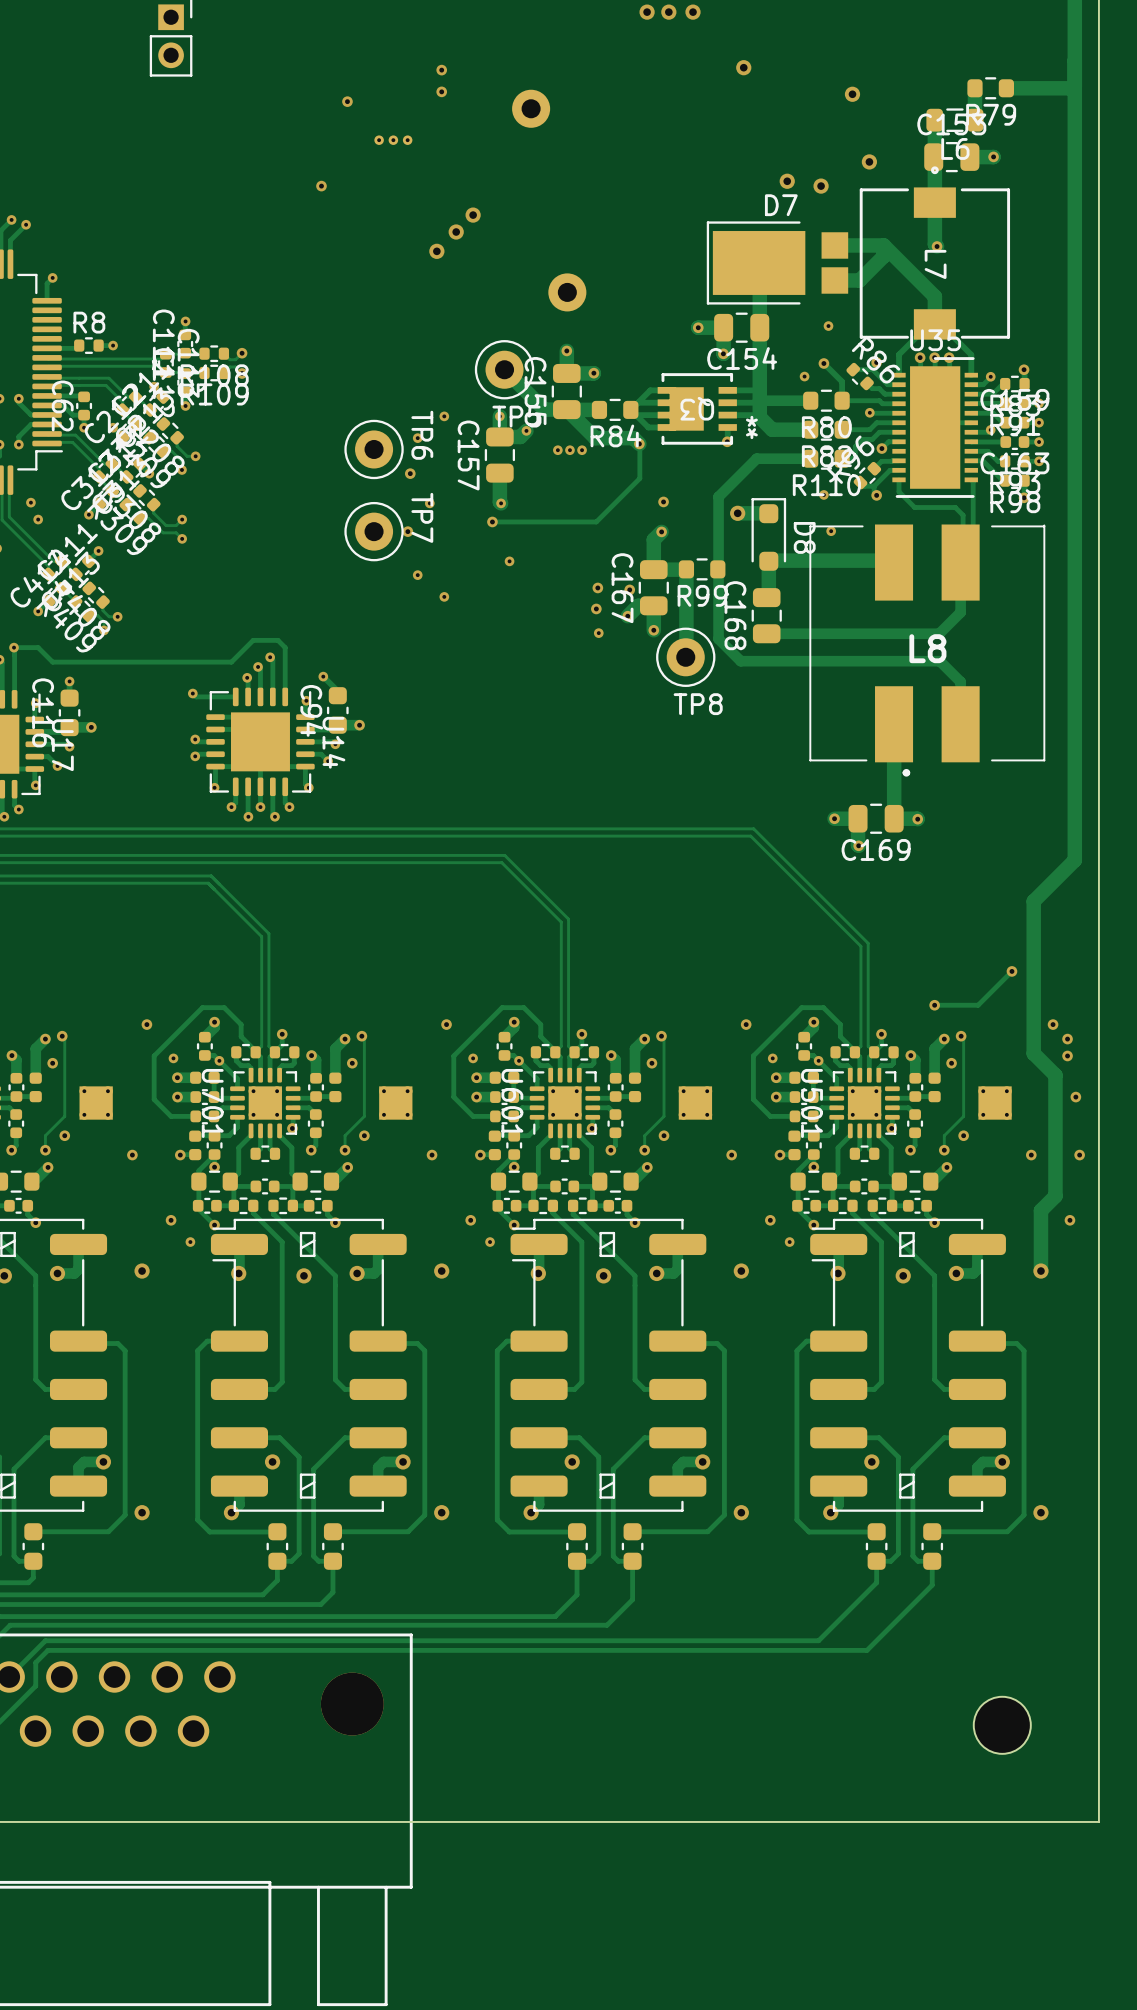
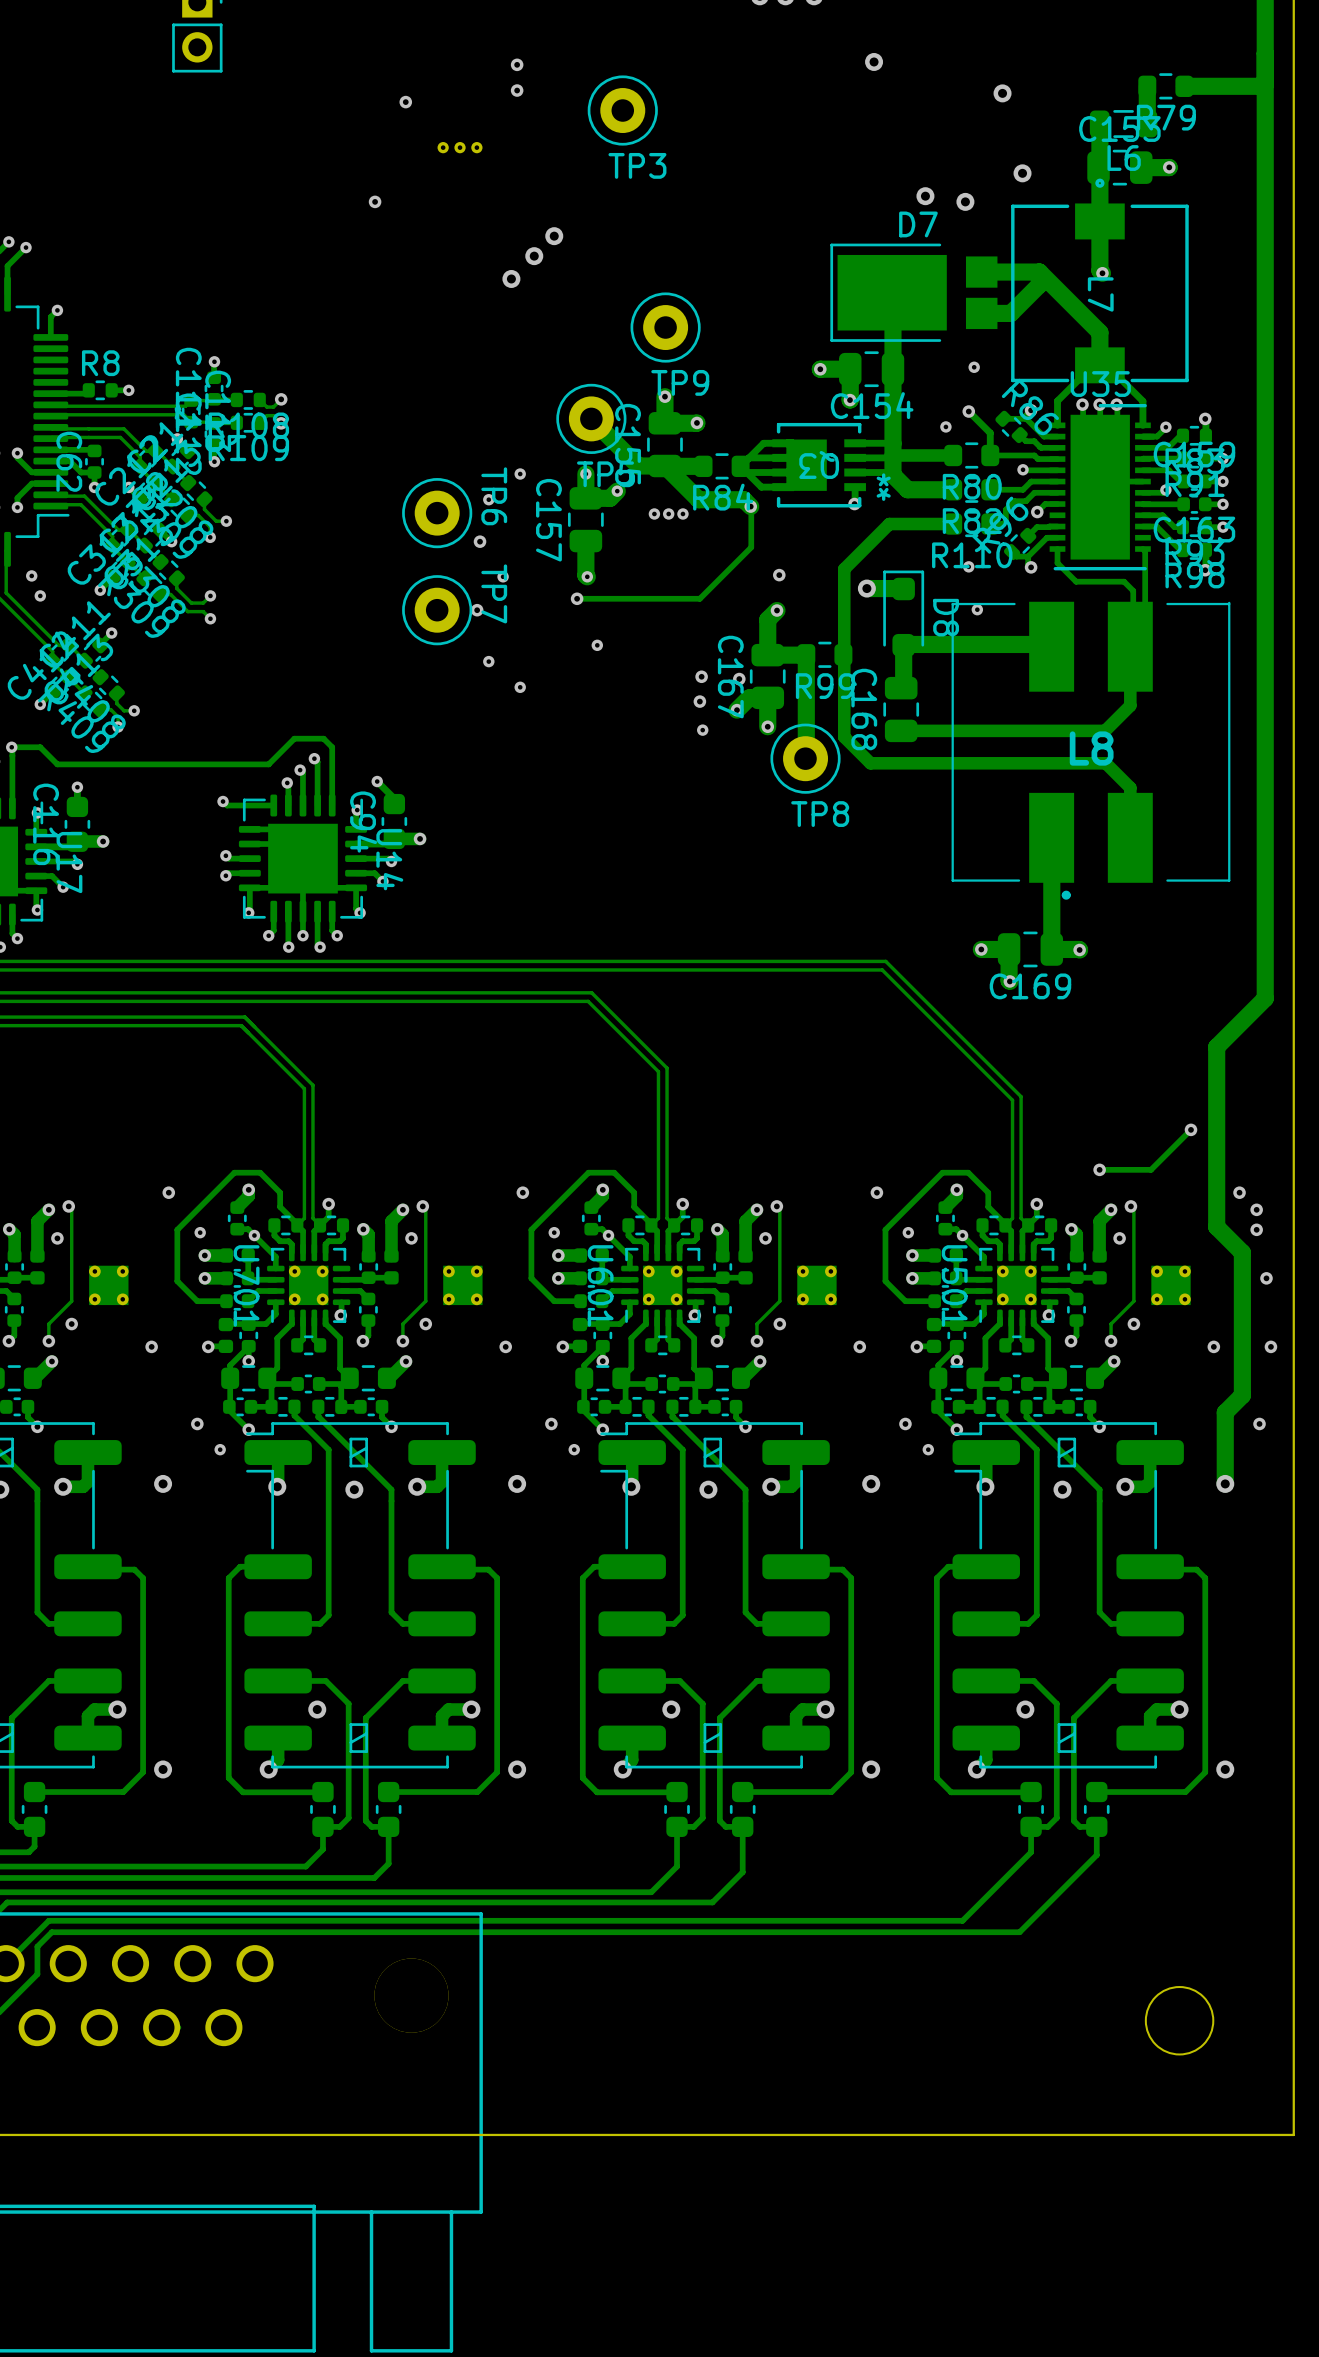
TP3 side: top (531, 108) -> bottom (622, 110)
TP9 side: top (567, 292) -> bottom (665, 327)

